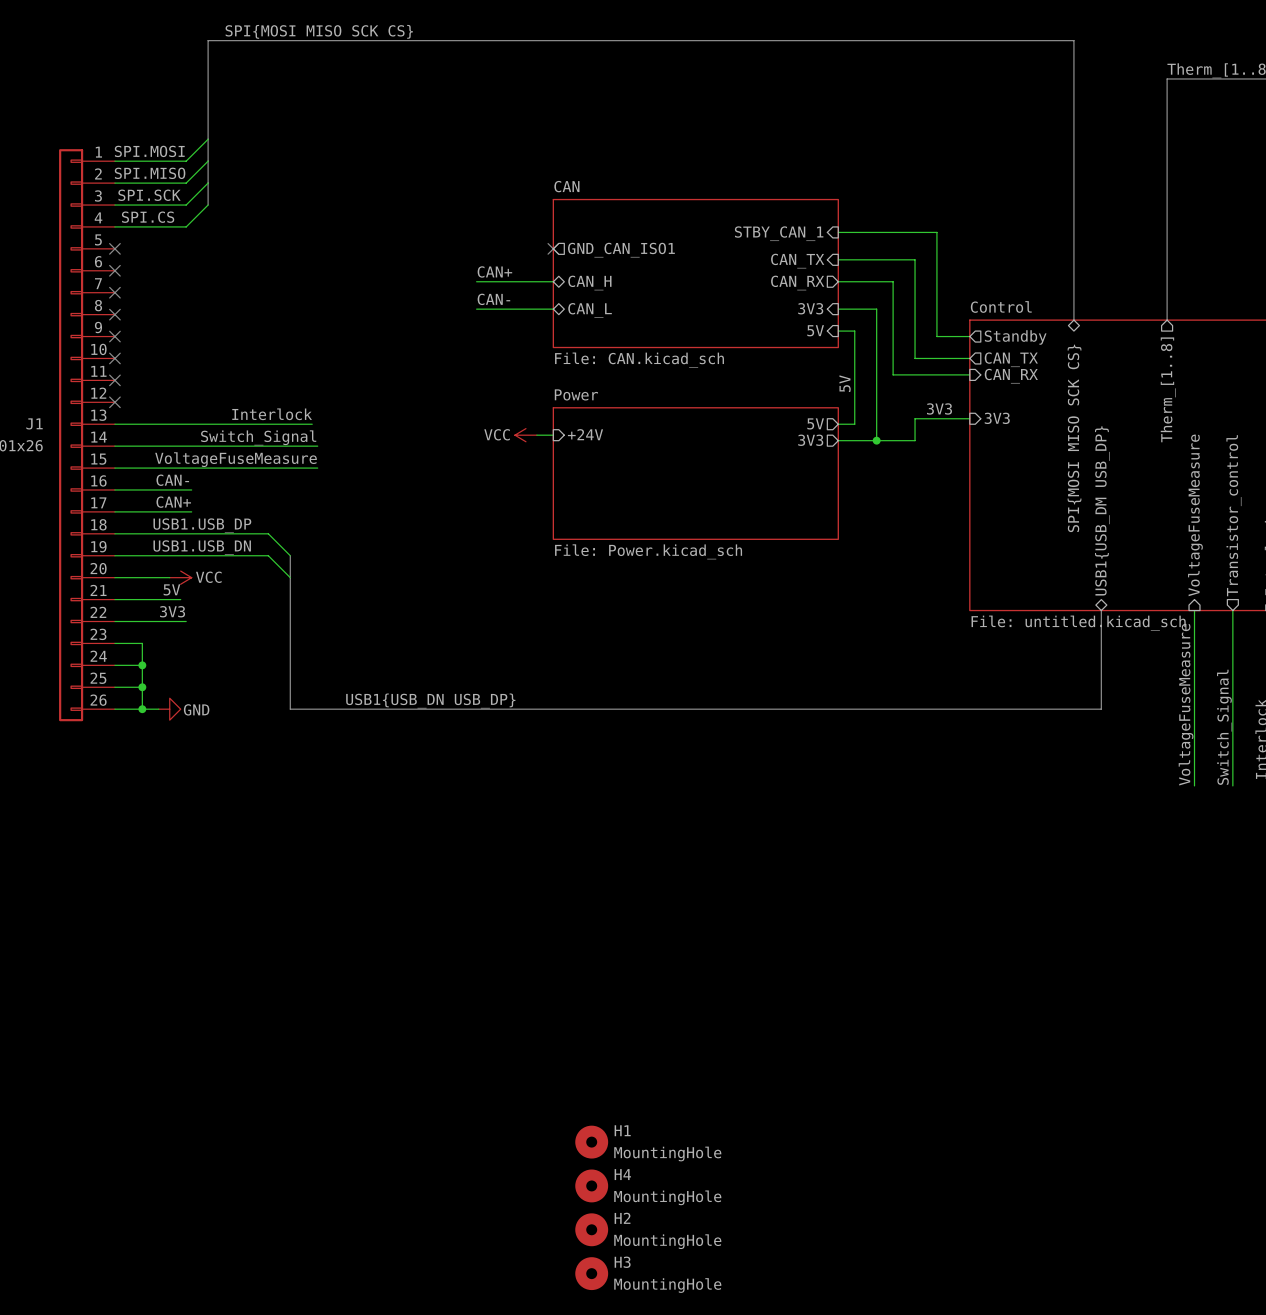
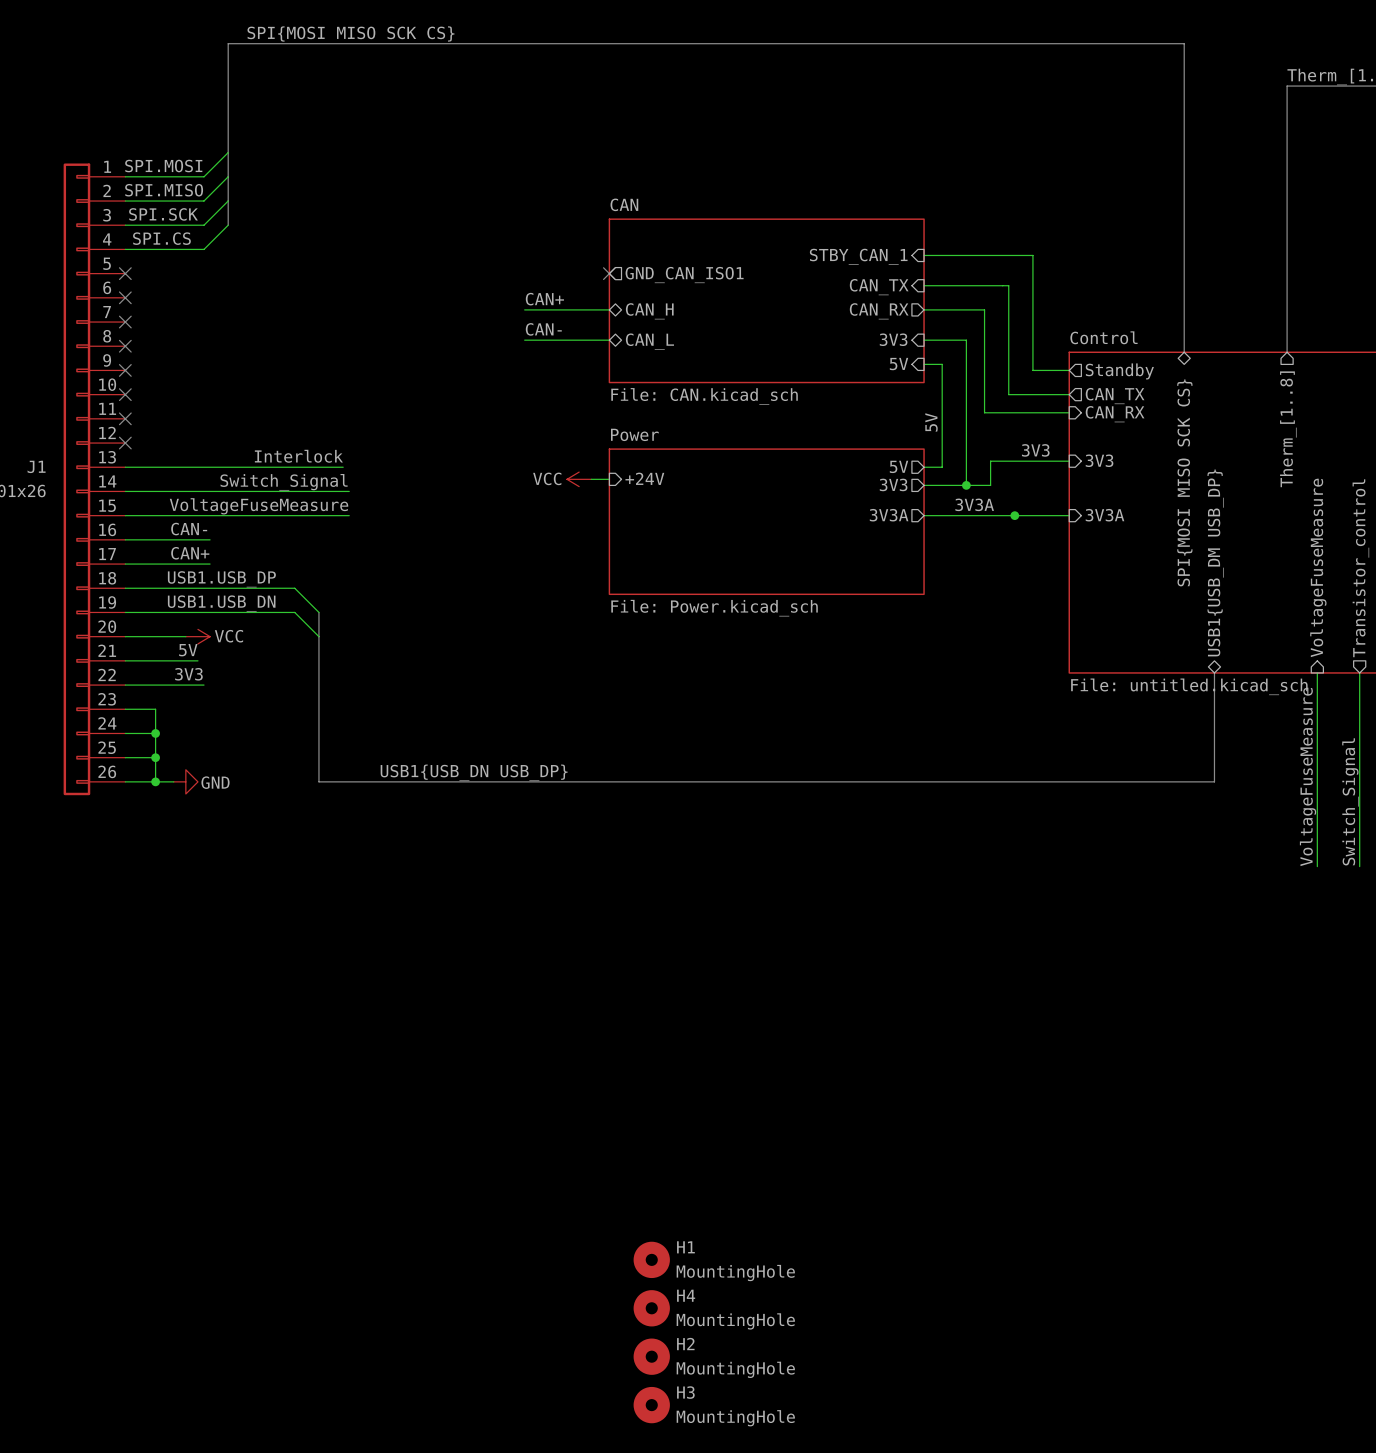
wire: (915, 418) (915, 440) (898, 440) -> (1008, 461) (990, 461) (990, 485)
label: none -> 3V3A (974, 504)
sheet pin: none -> 3V3A (889, 515)
sheet pin: none -> 3V3A (1105, 515)
wire: none -> (924, 515) (1069, 515)
junction: none -> (1014, 515)

